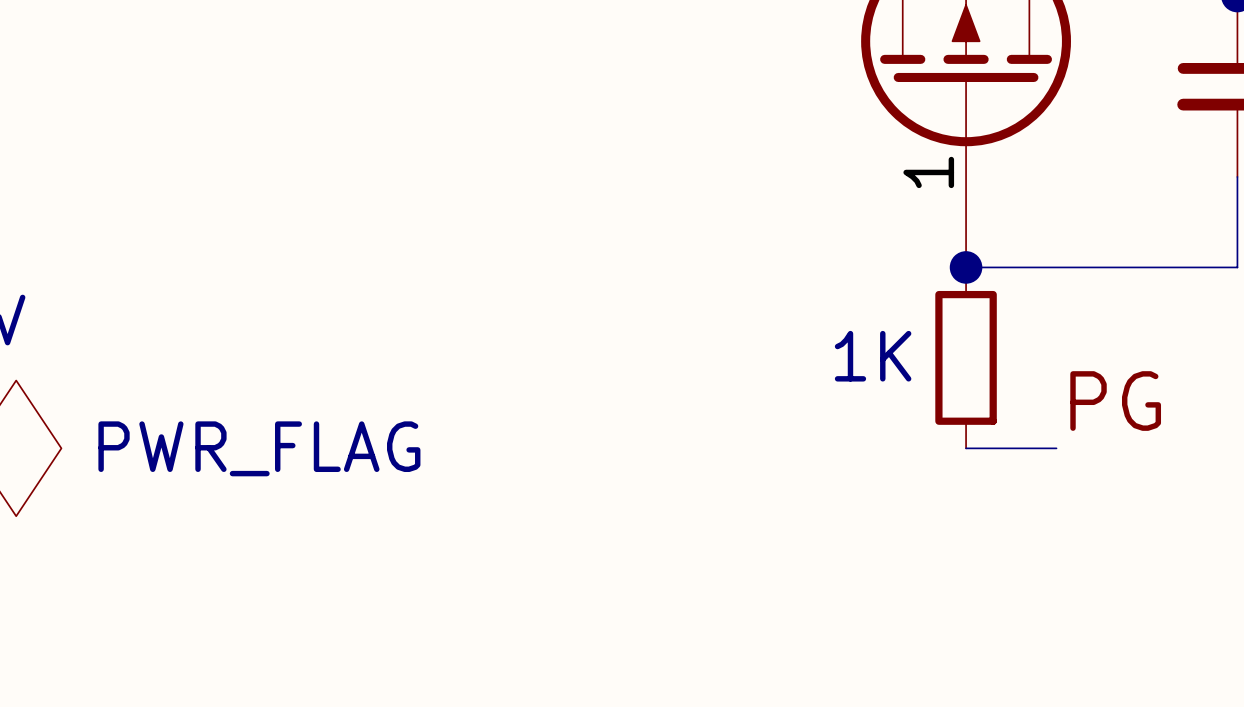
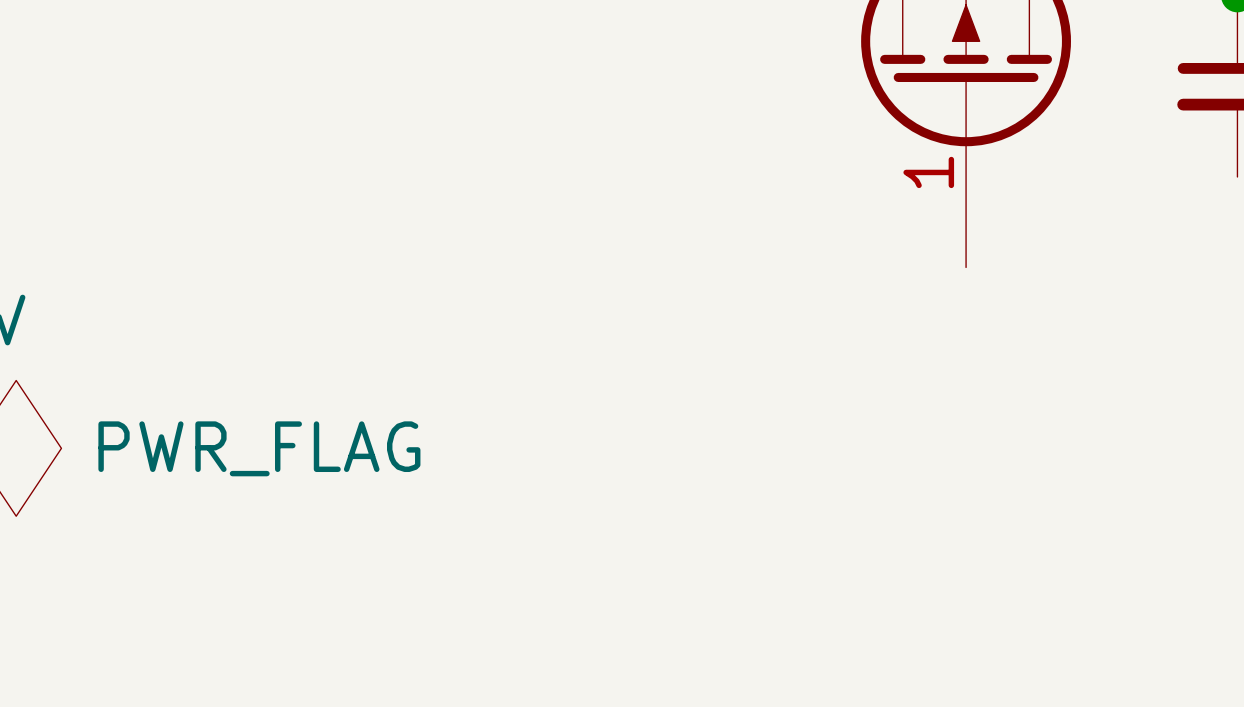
wire: (1237, 176) (1237, 267) (966, 267) -> none
junction: (966, 267) -> none
part: 1K (966, 357) -> none
label: PG (1115, 401) -> none
wire: (966, 448) (1056, 448) -> none

